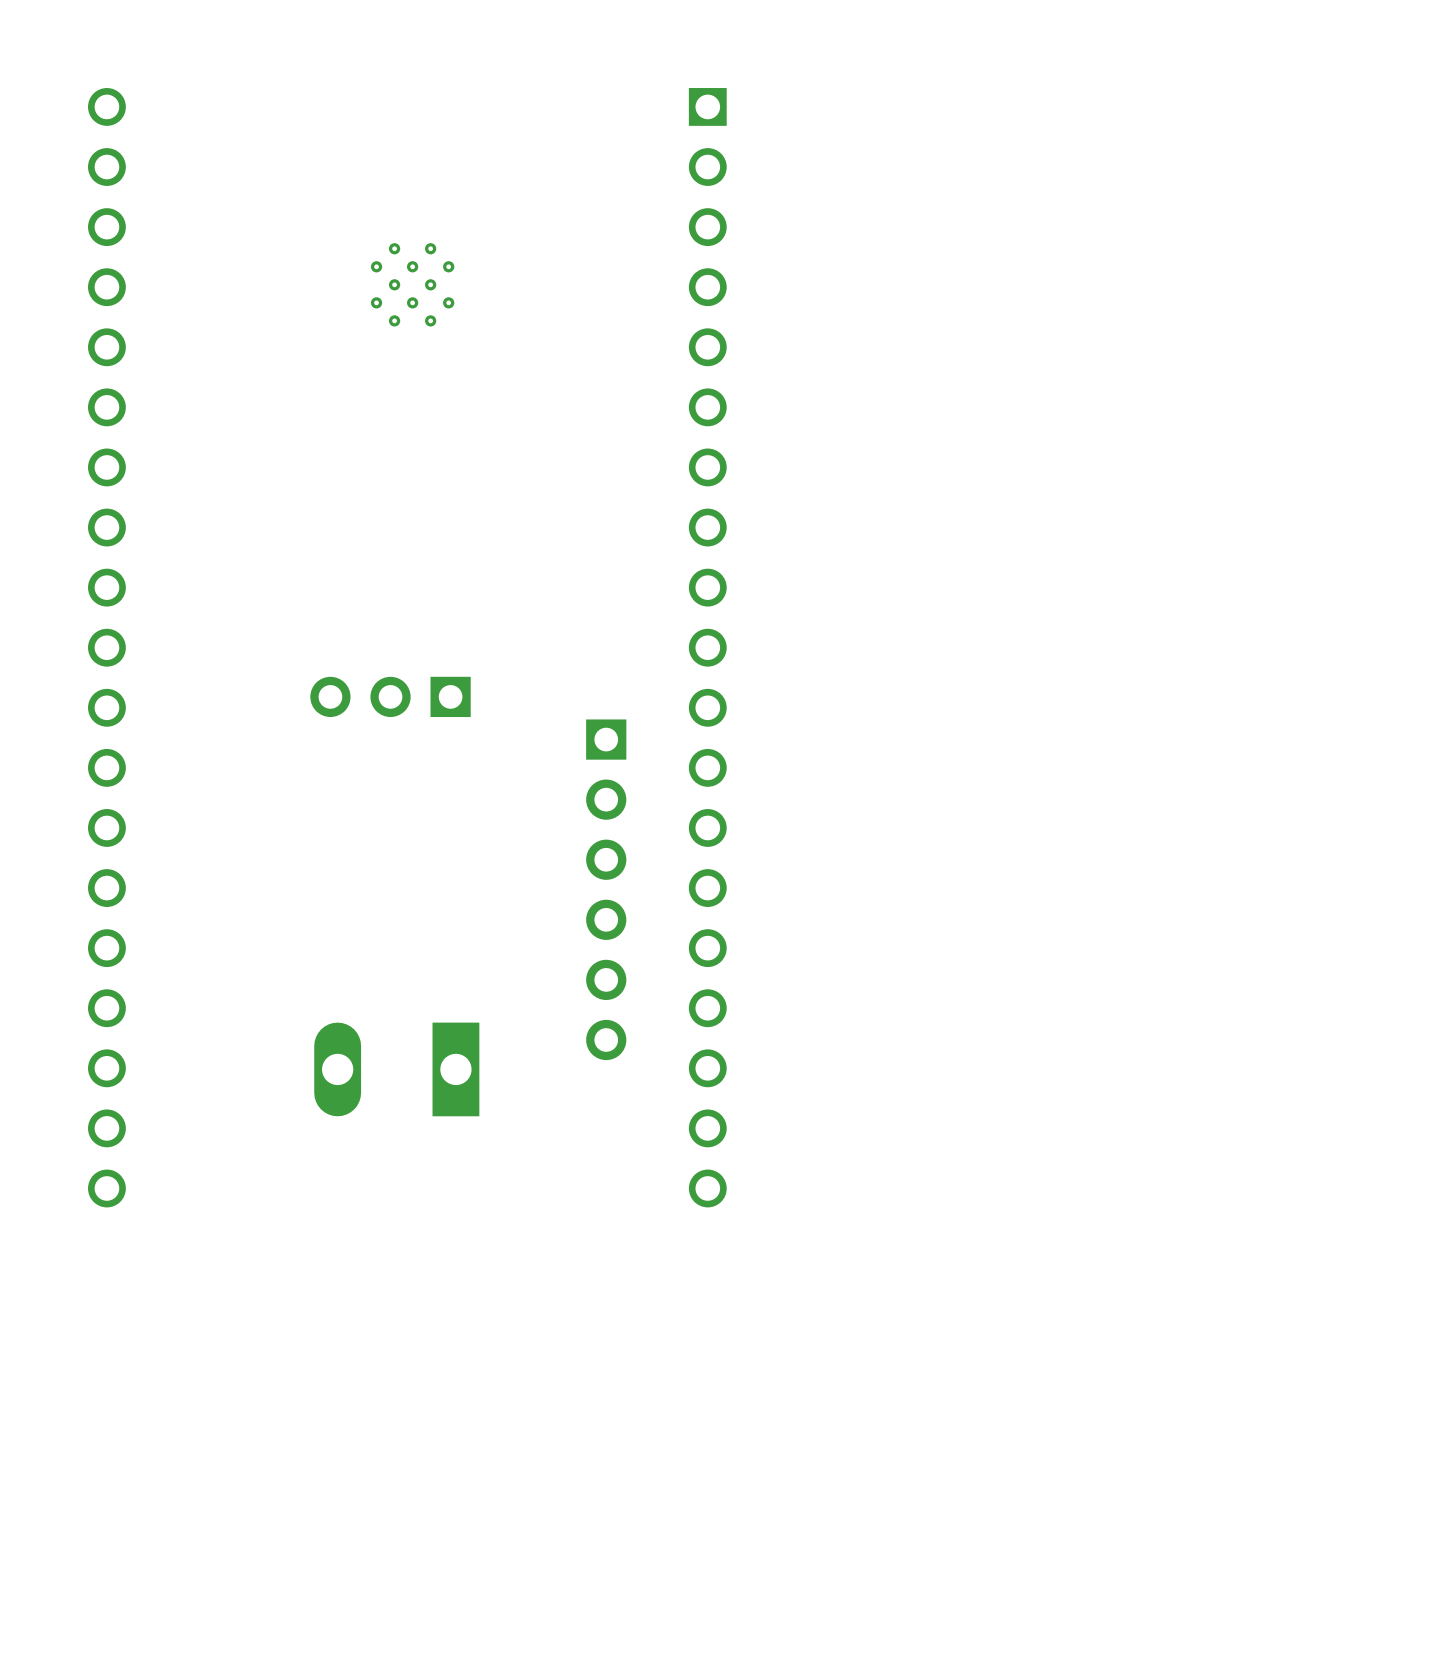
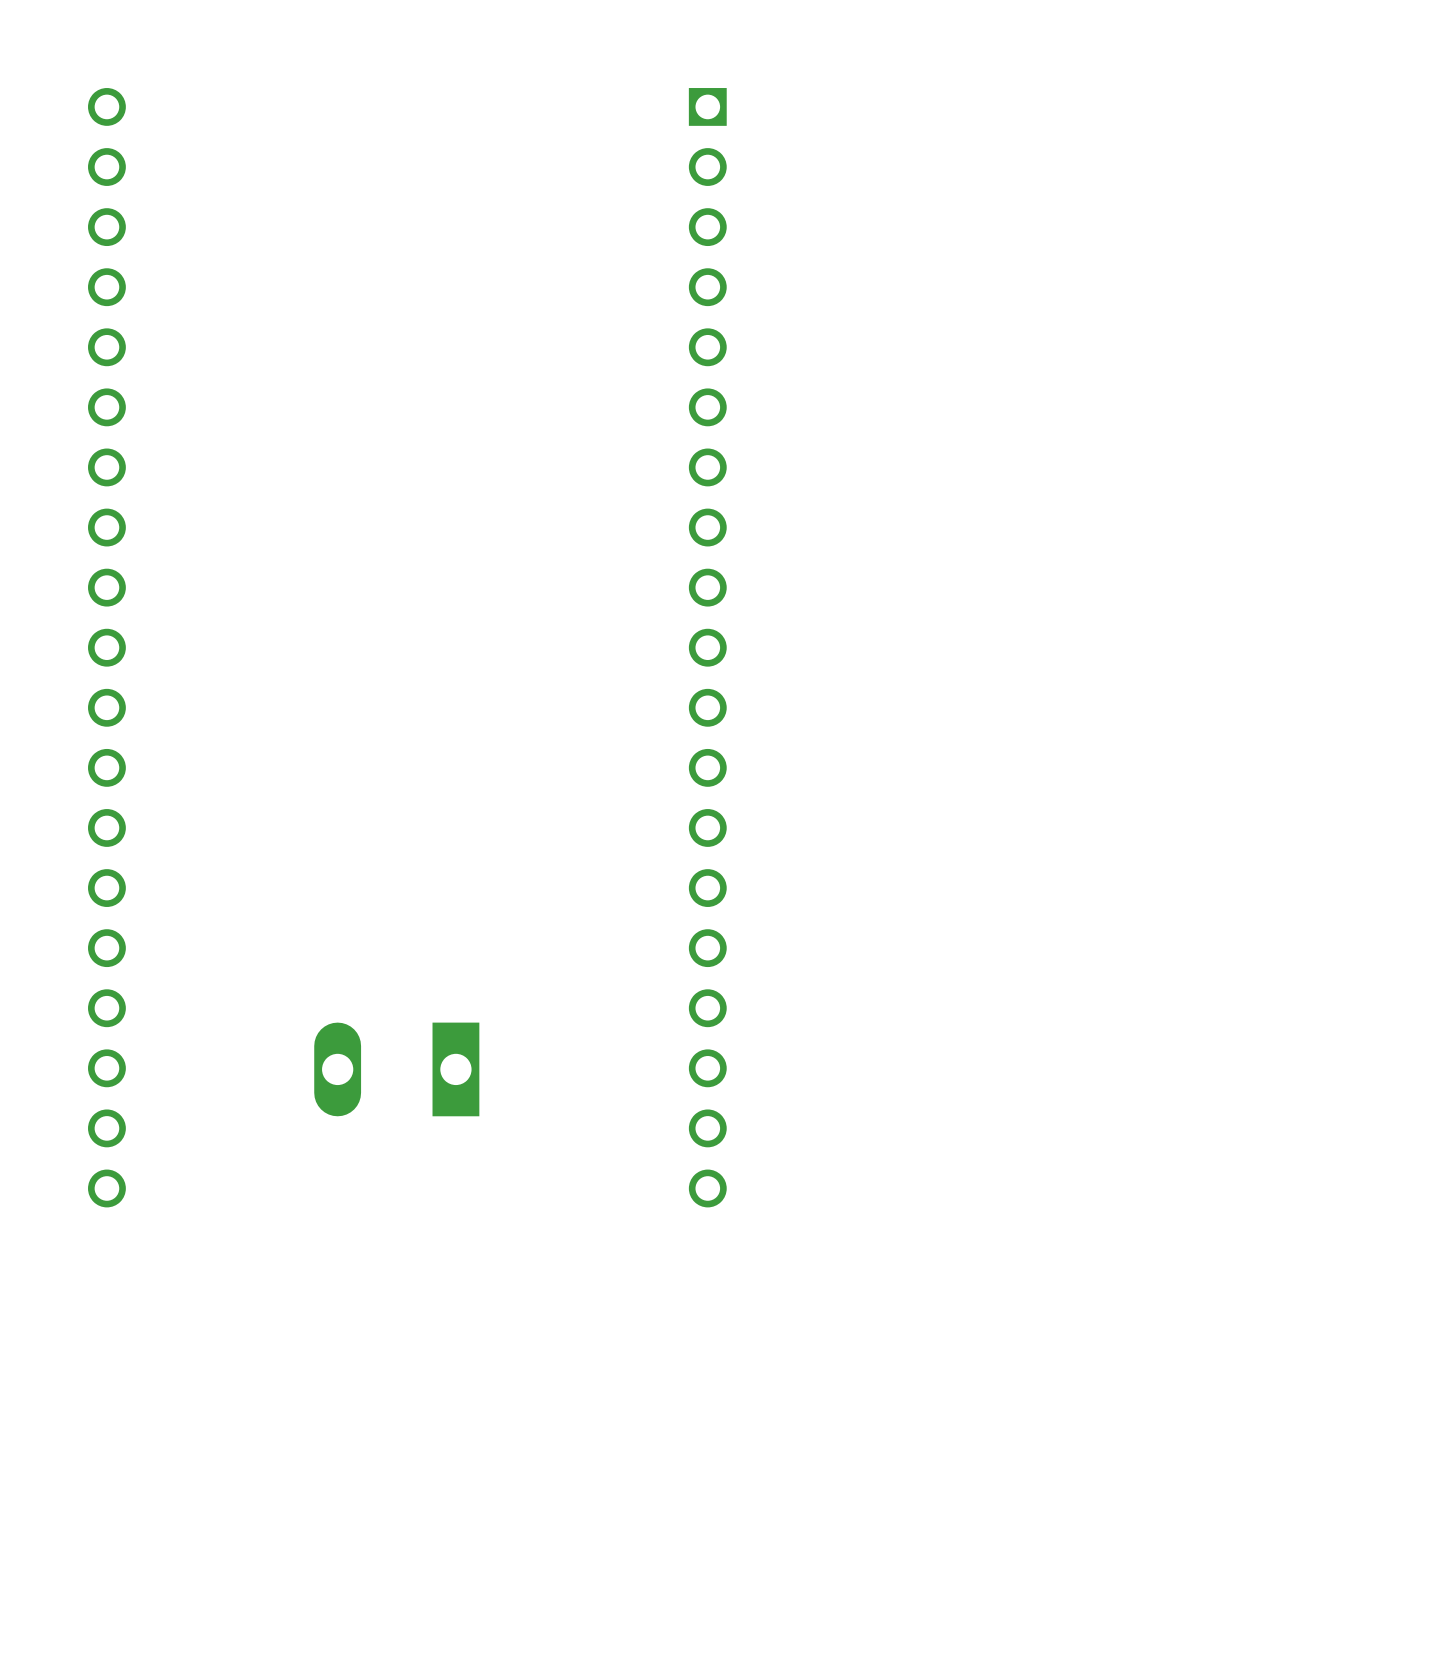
part: (412, 284) -> none
part: (390, 696) -> none
part: (606, 889) -> none

